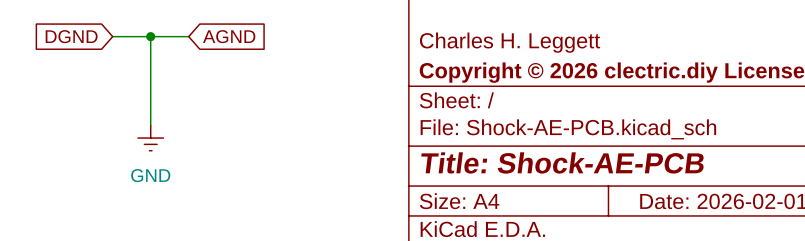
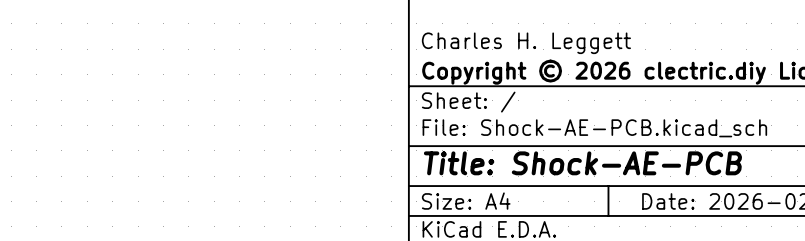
global label: DGND (71, 36) -> none
wire: (112, 36) (188, 36) -> none
wire: (150, 36) (150, 125) -> none
junction: (150, 36) -> none
global label: AGND (229, 36) -> none
power symbol: GND (150, 138) -> none

